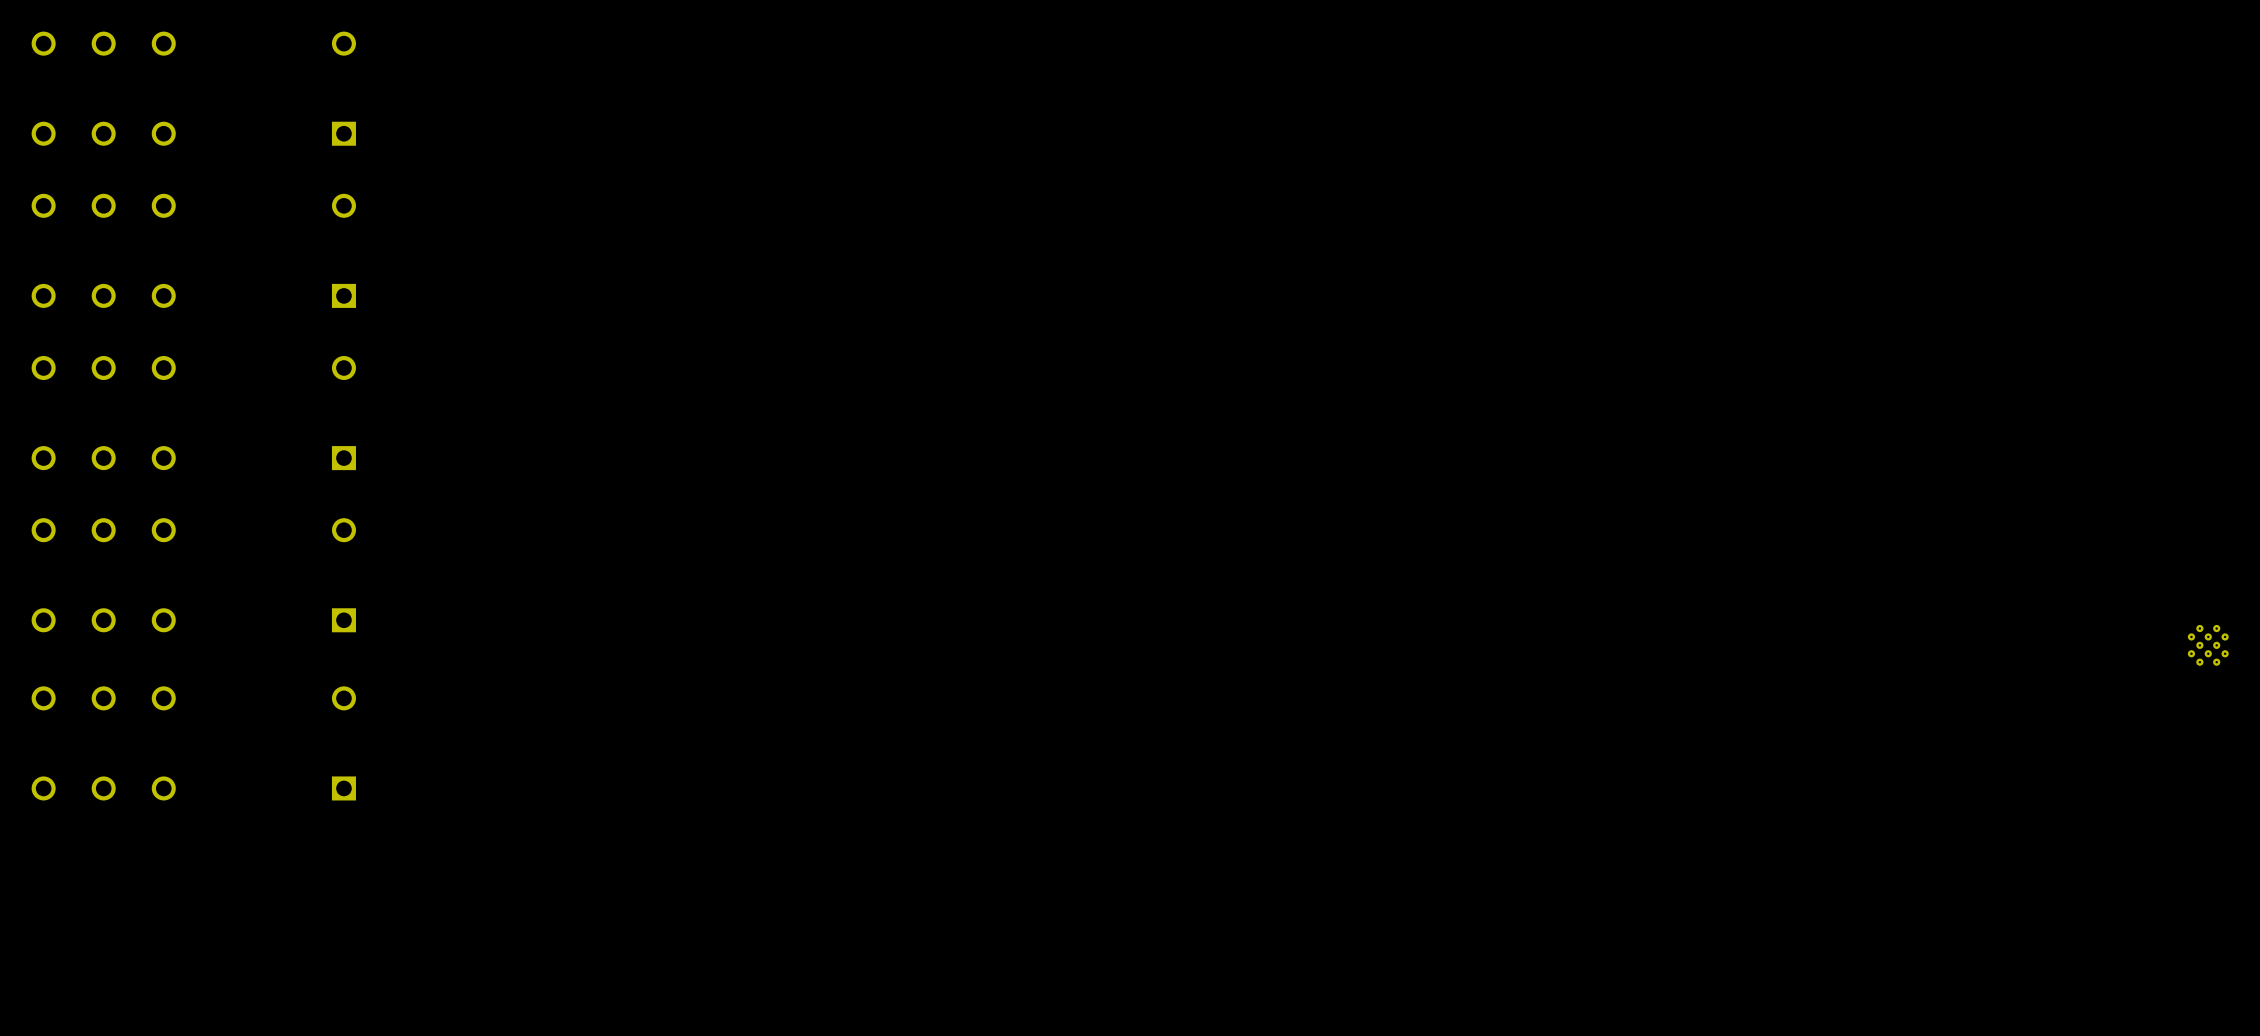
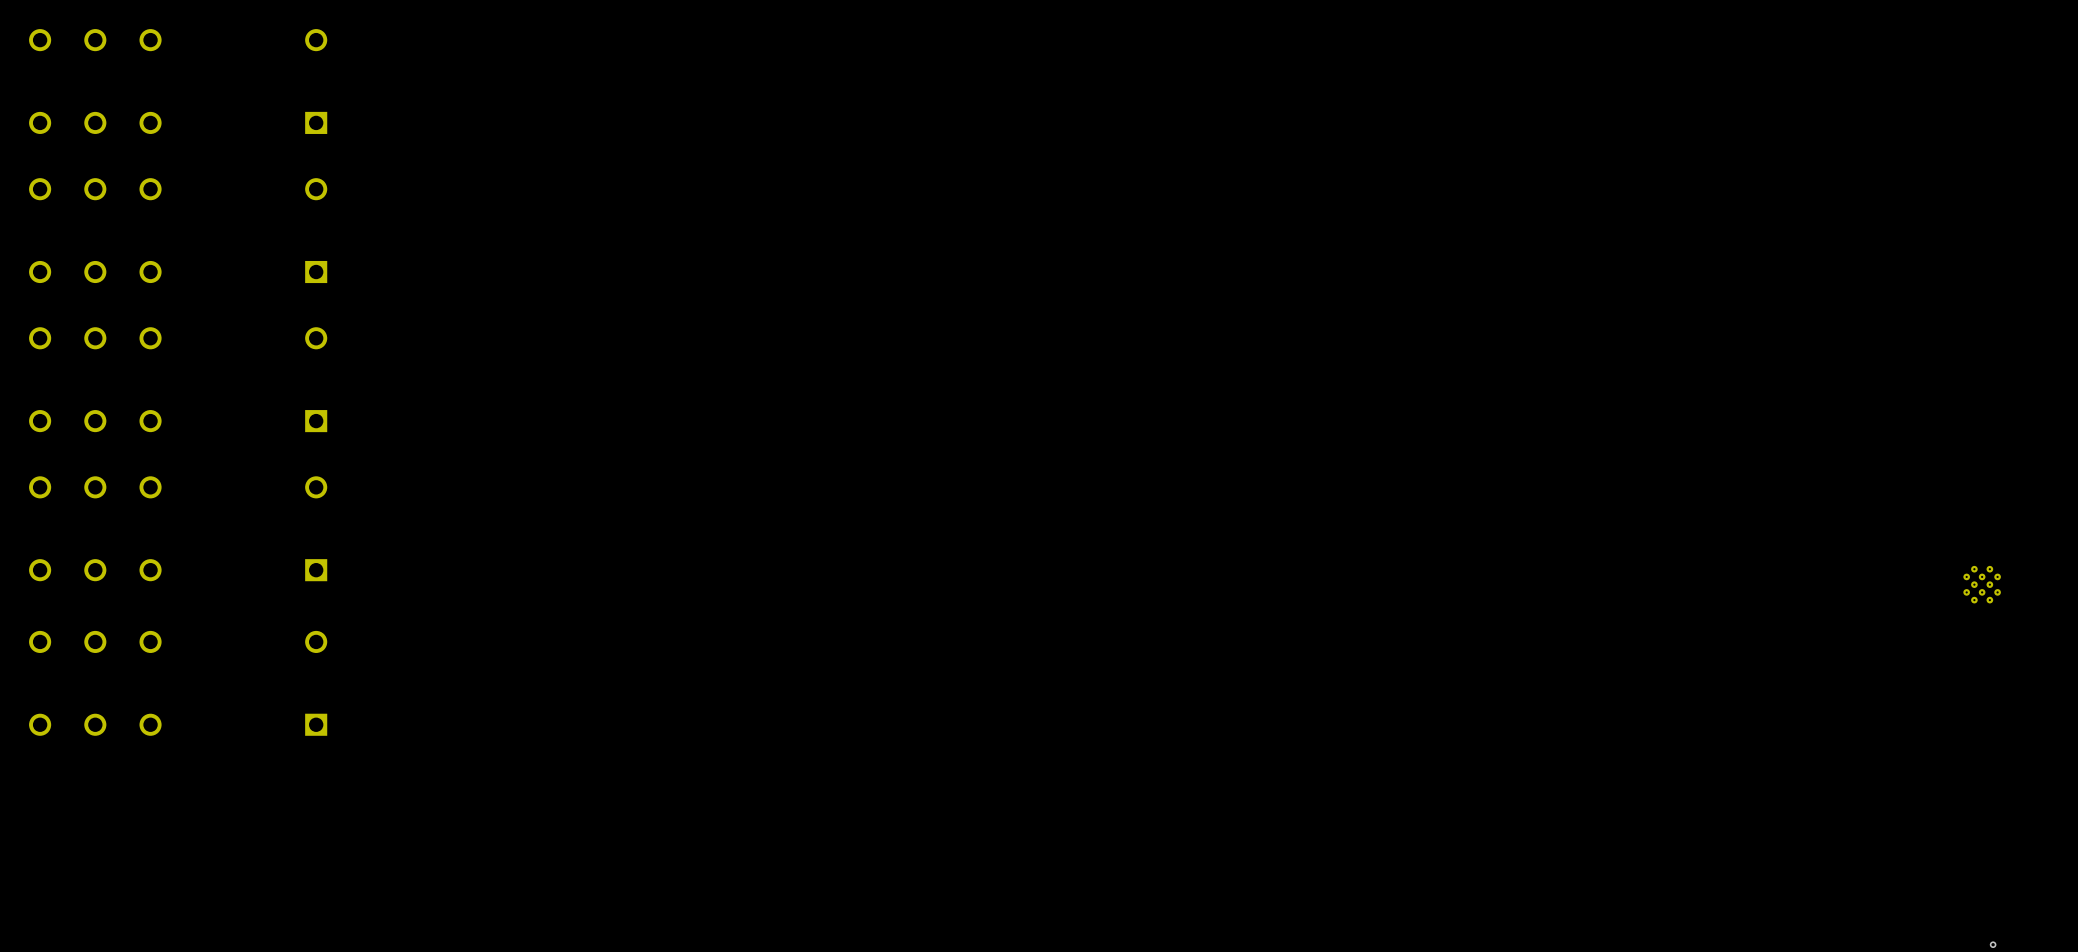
part position: (2208, 645) -> (1982, 584)
via: none -> (1993, 944)

